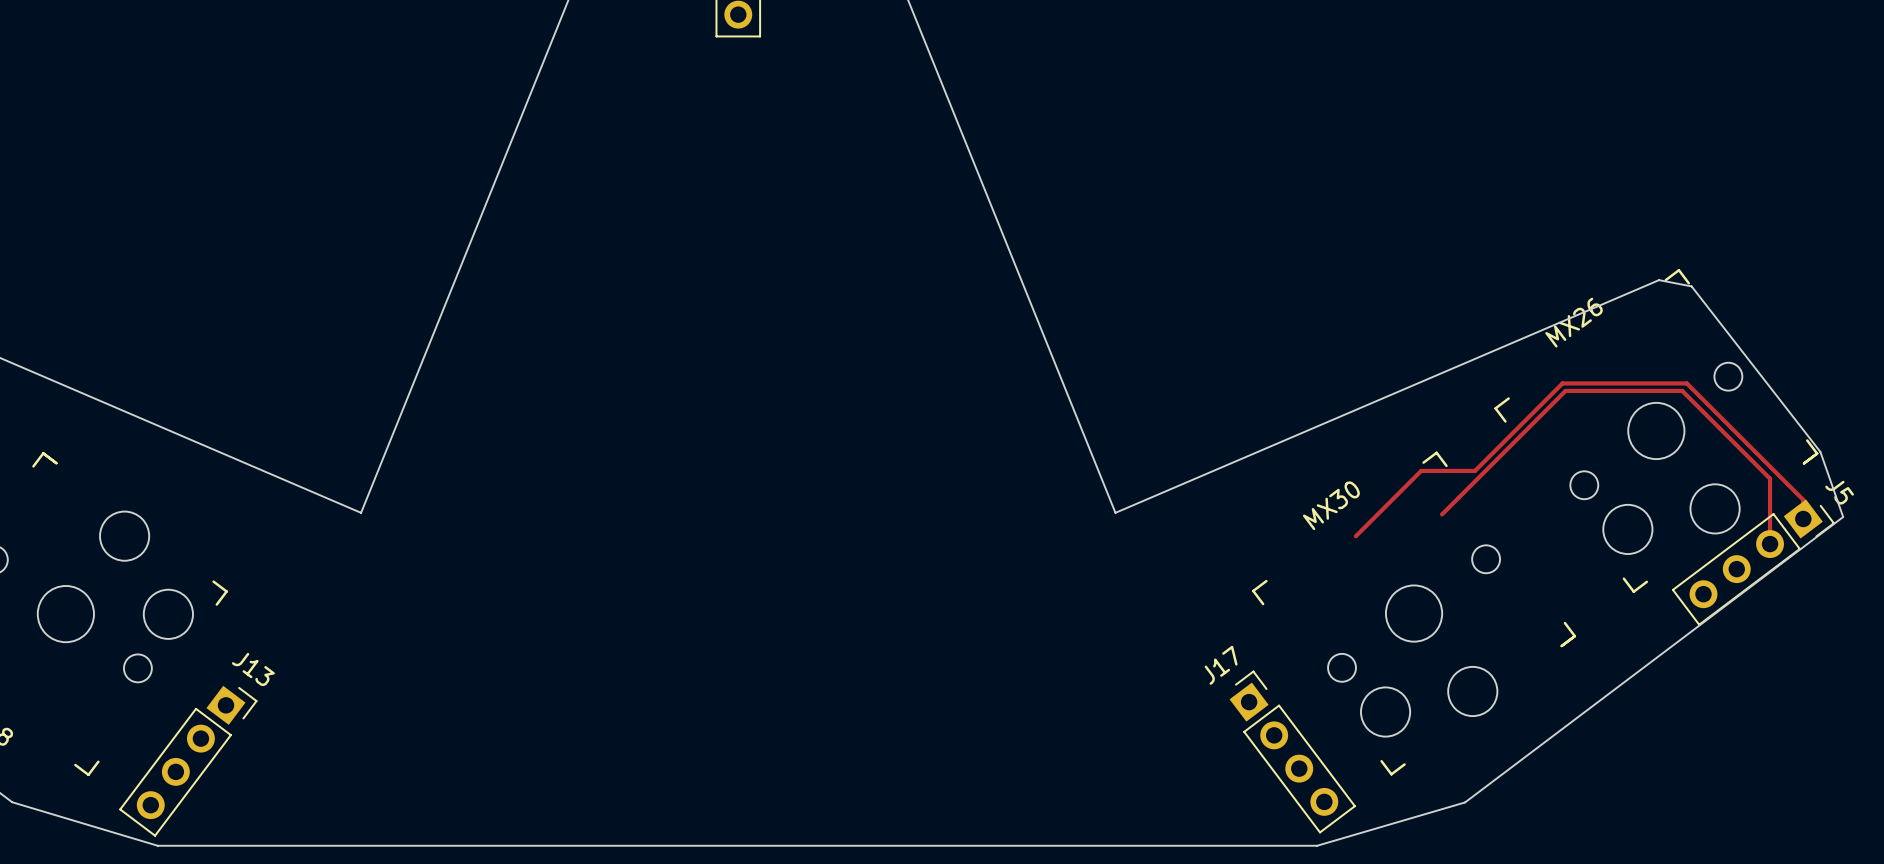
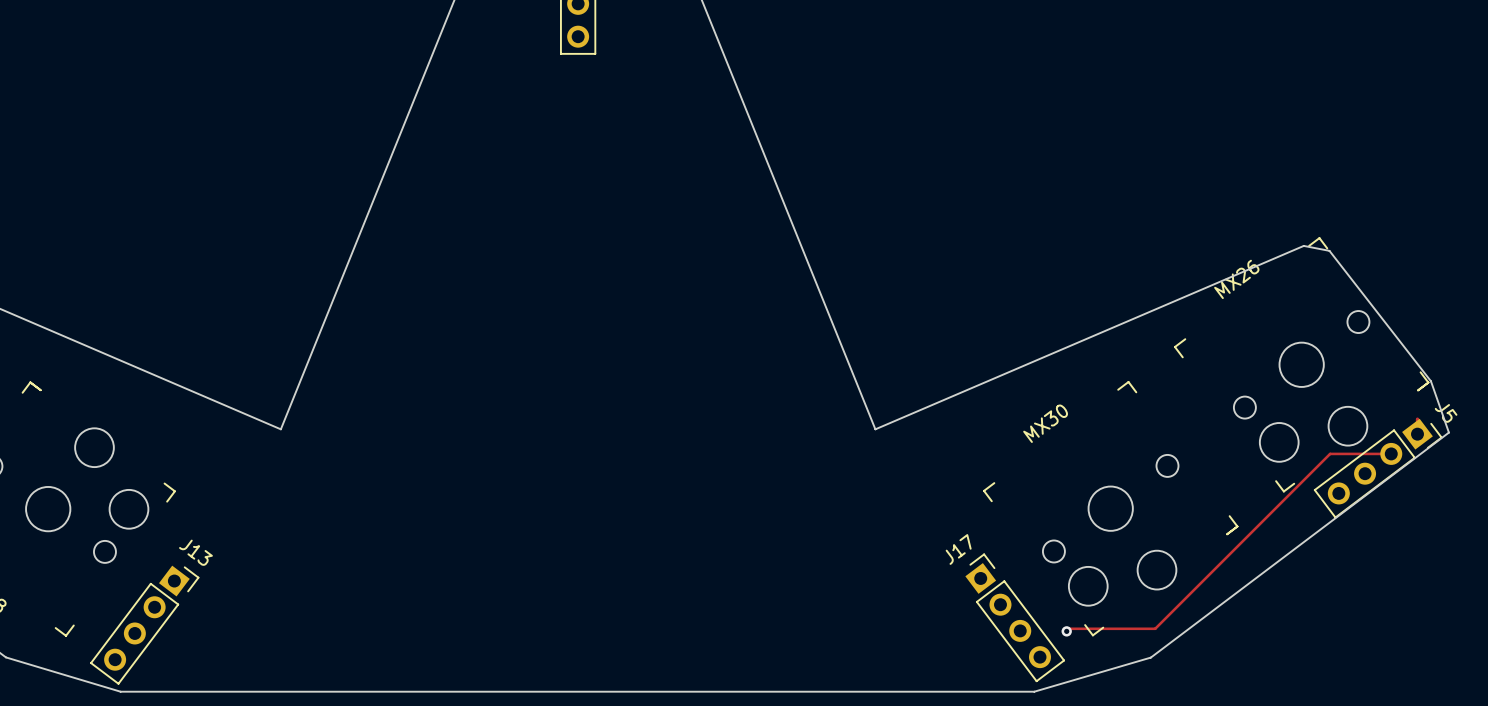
track: (1803, 499) (1686, 383) (1562, 383) (1475, 470) (1421, 470) (1355, 536) -> none
track: (1442, 514) (1565, 390) (1682, 390) (1770, 478) (1770, 544) -> (1066, 631) (1069, 628) (1155, 628) (1330, 453) (1391, 453)
via: none -> (1066, 631)

